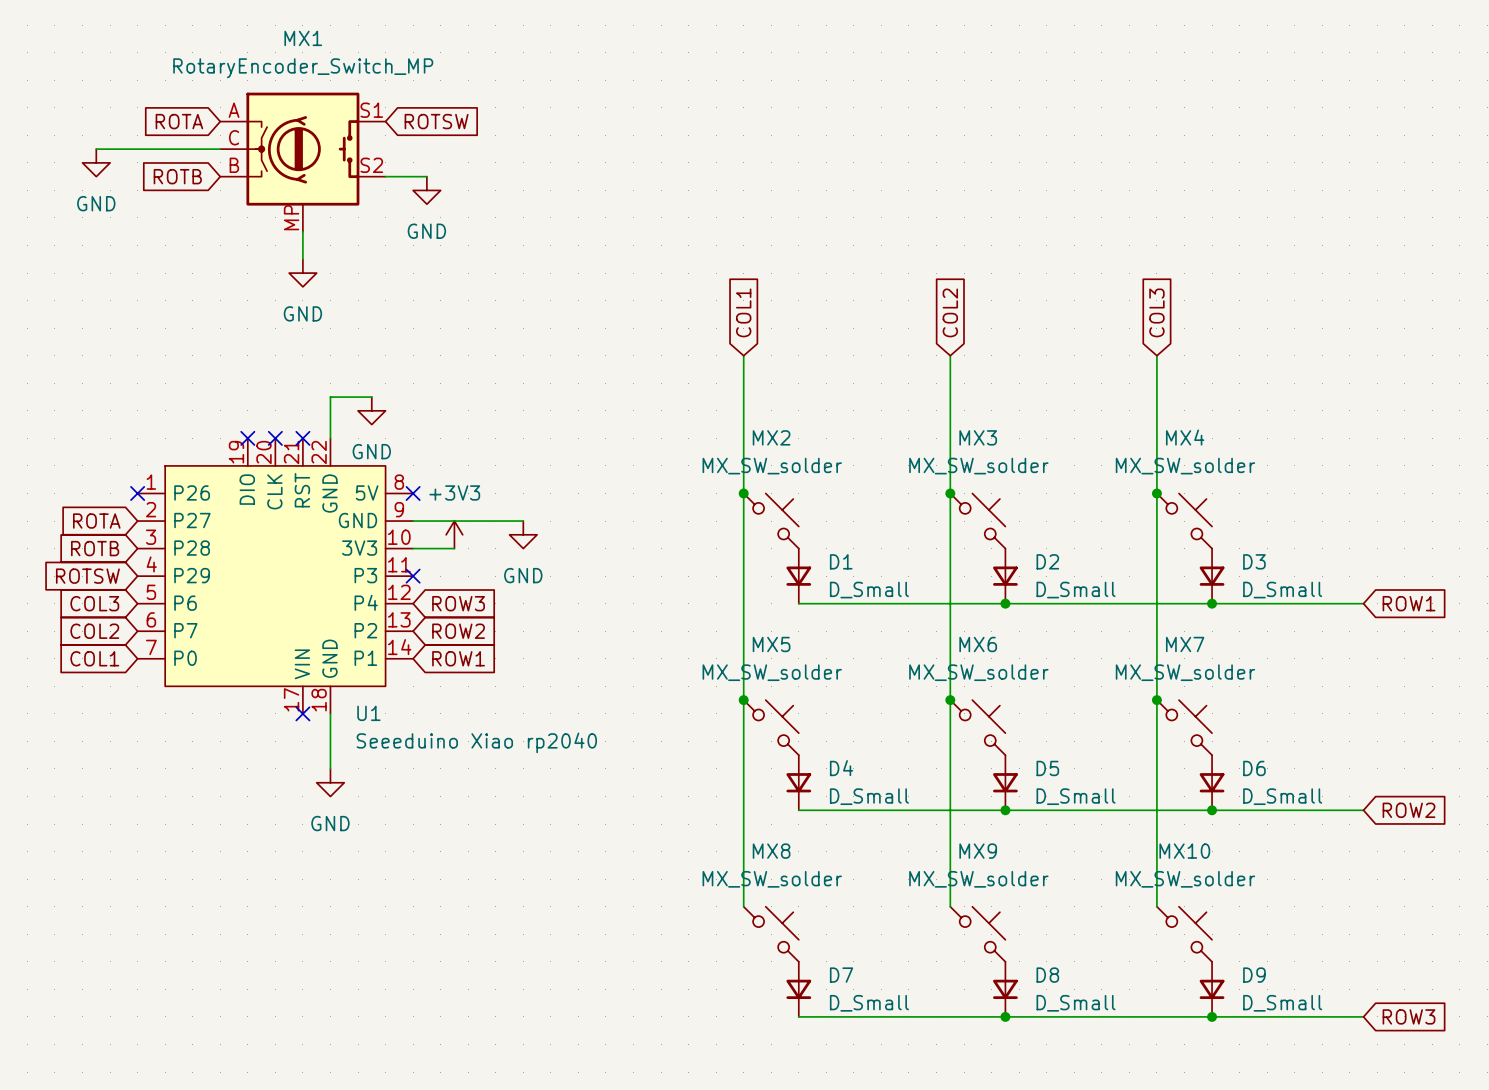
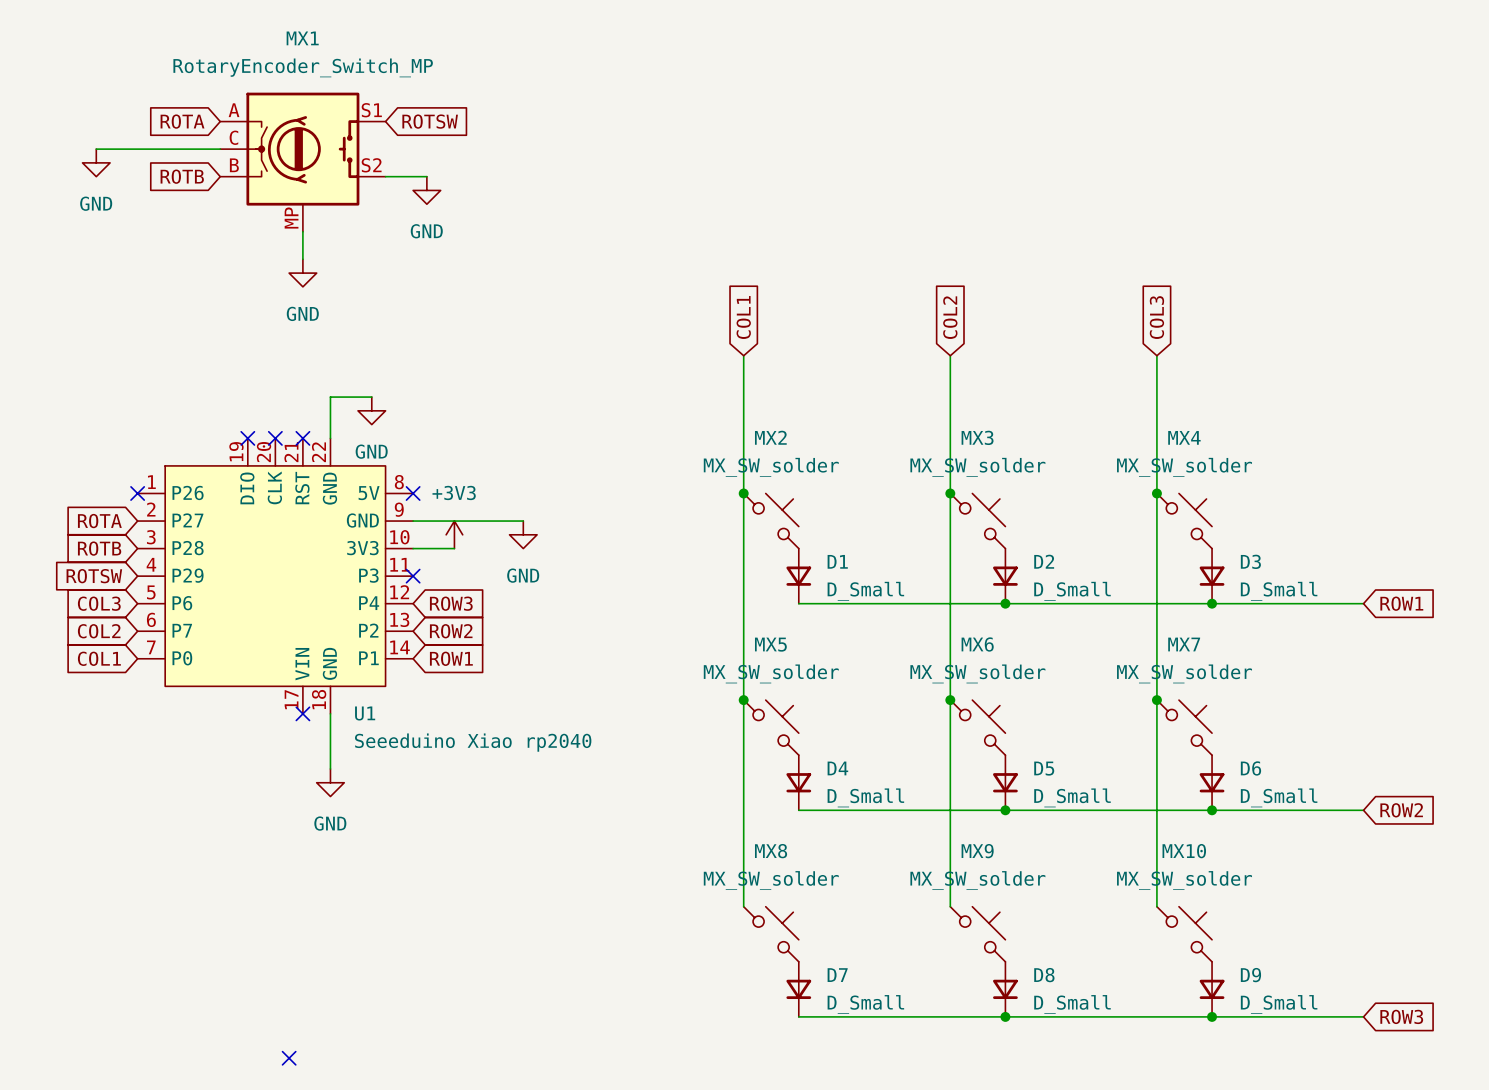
no-connect mark: none -> (289, 1058)

